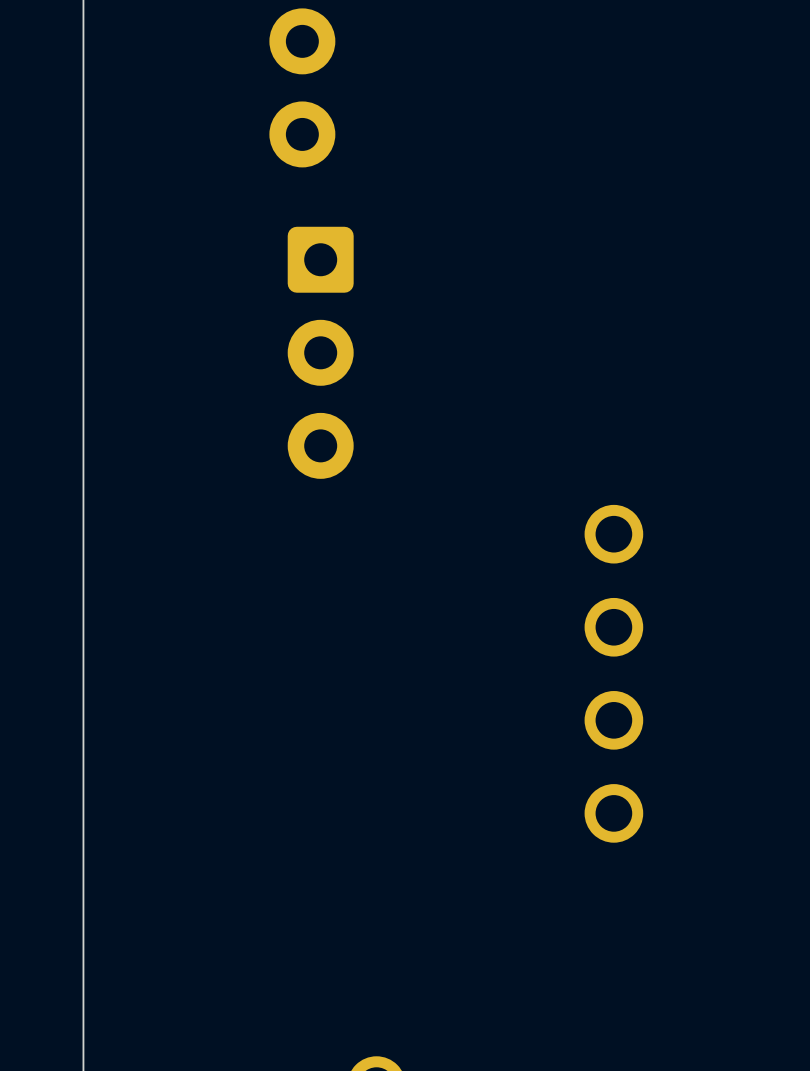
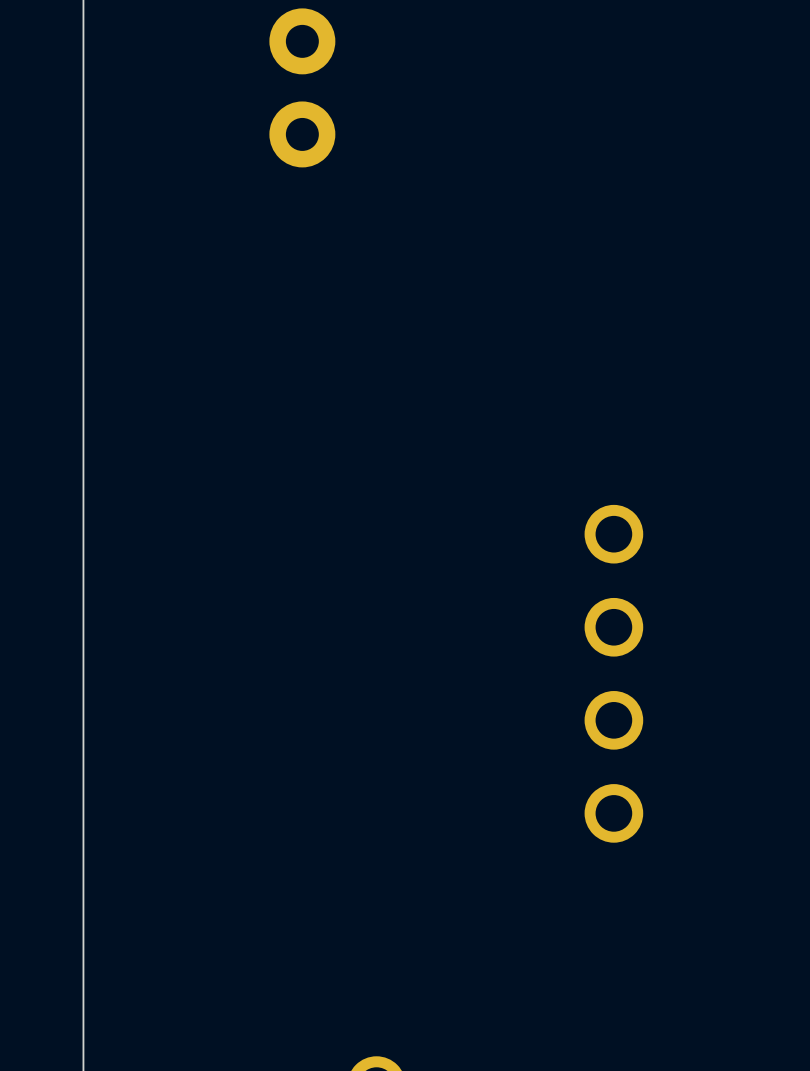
part: (320, 352) -> none

